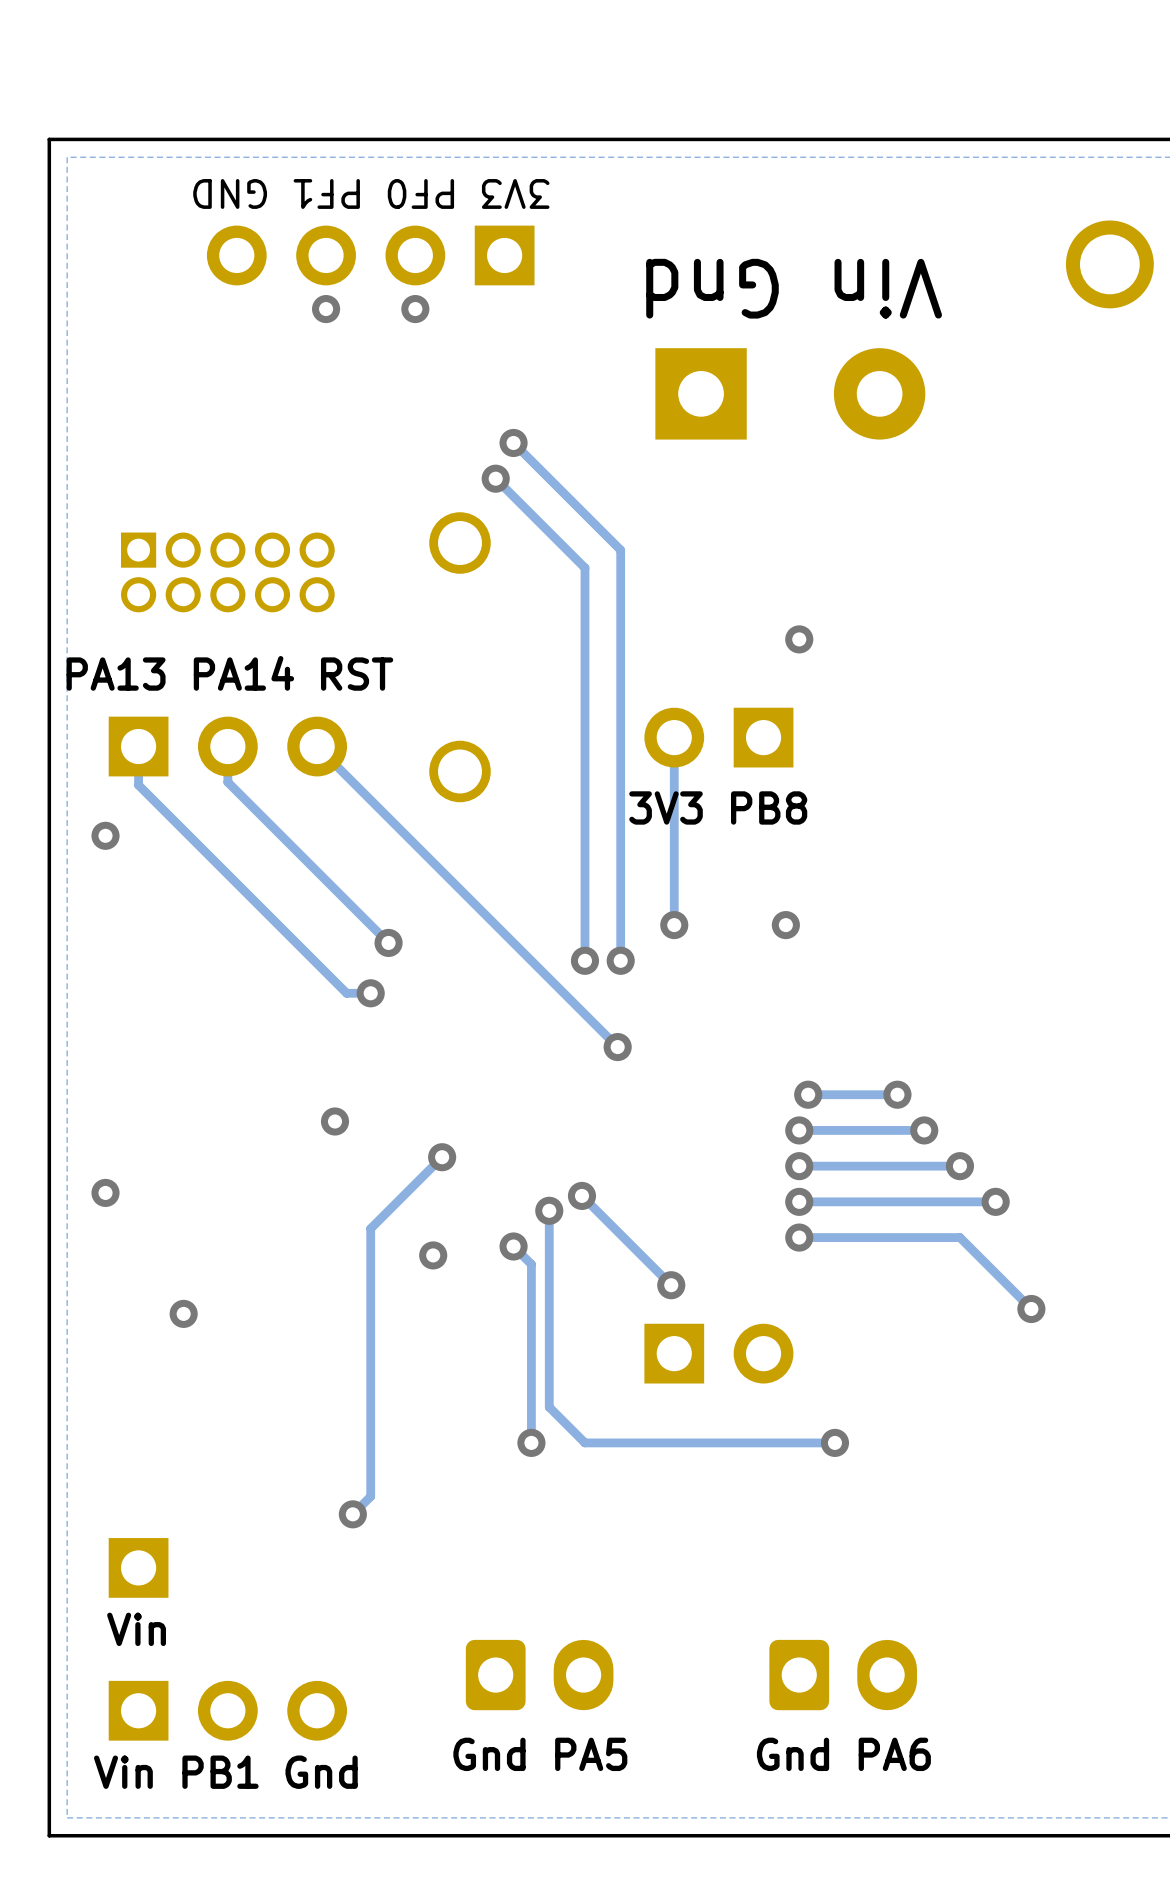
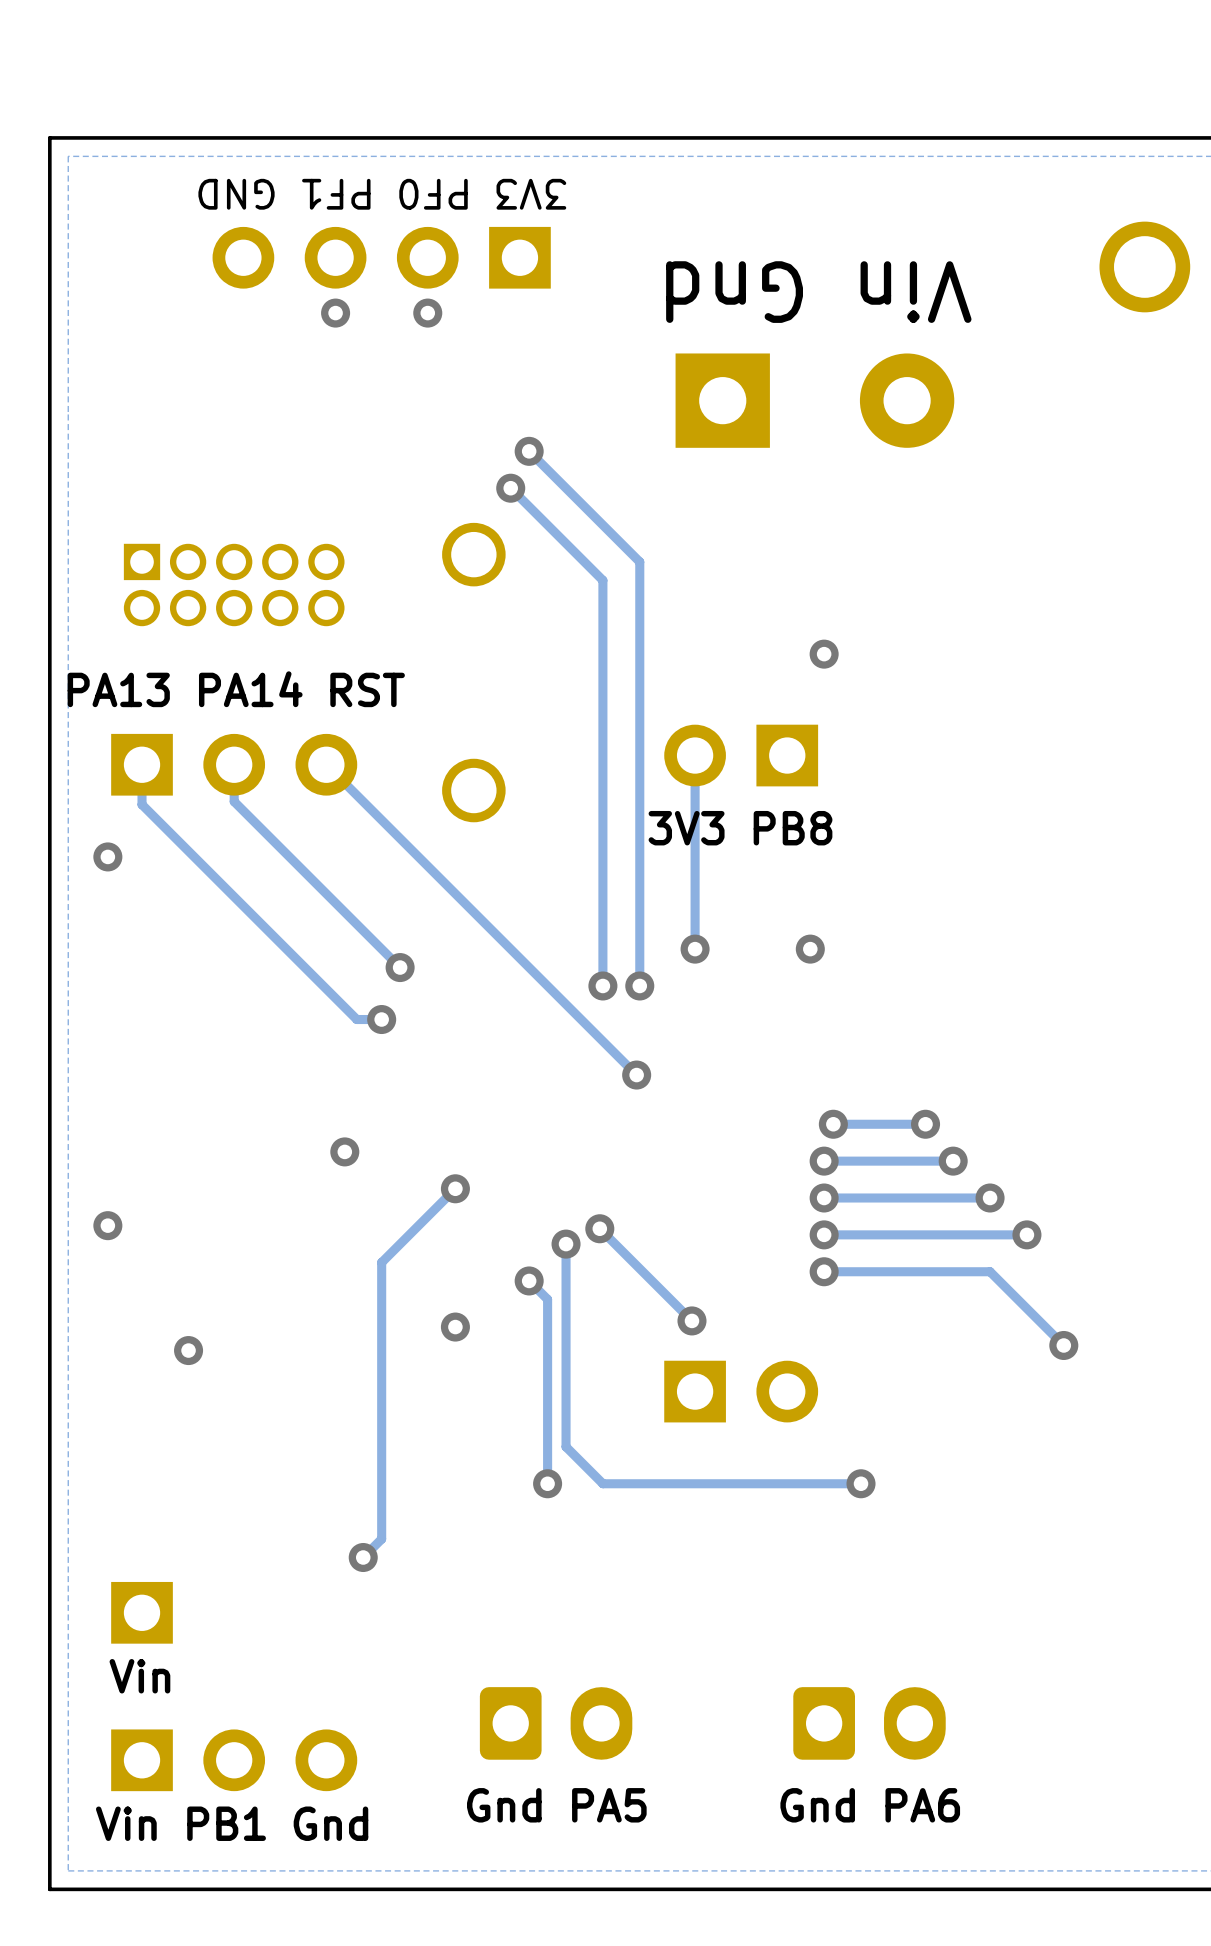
via position: (433, 1255) -> (455, 1327)

